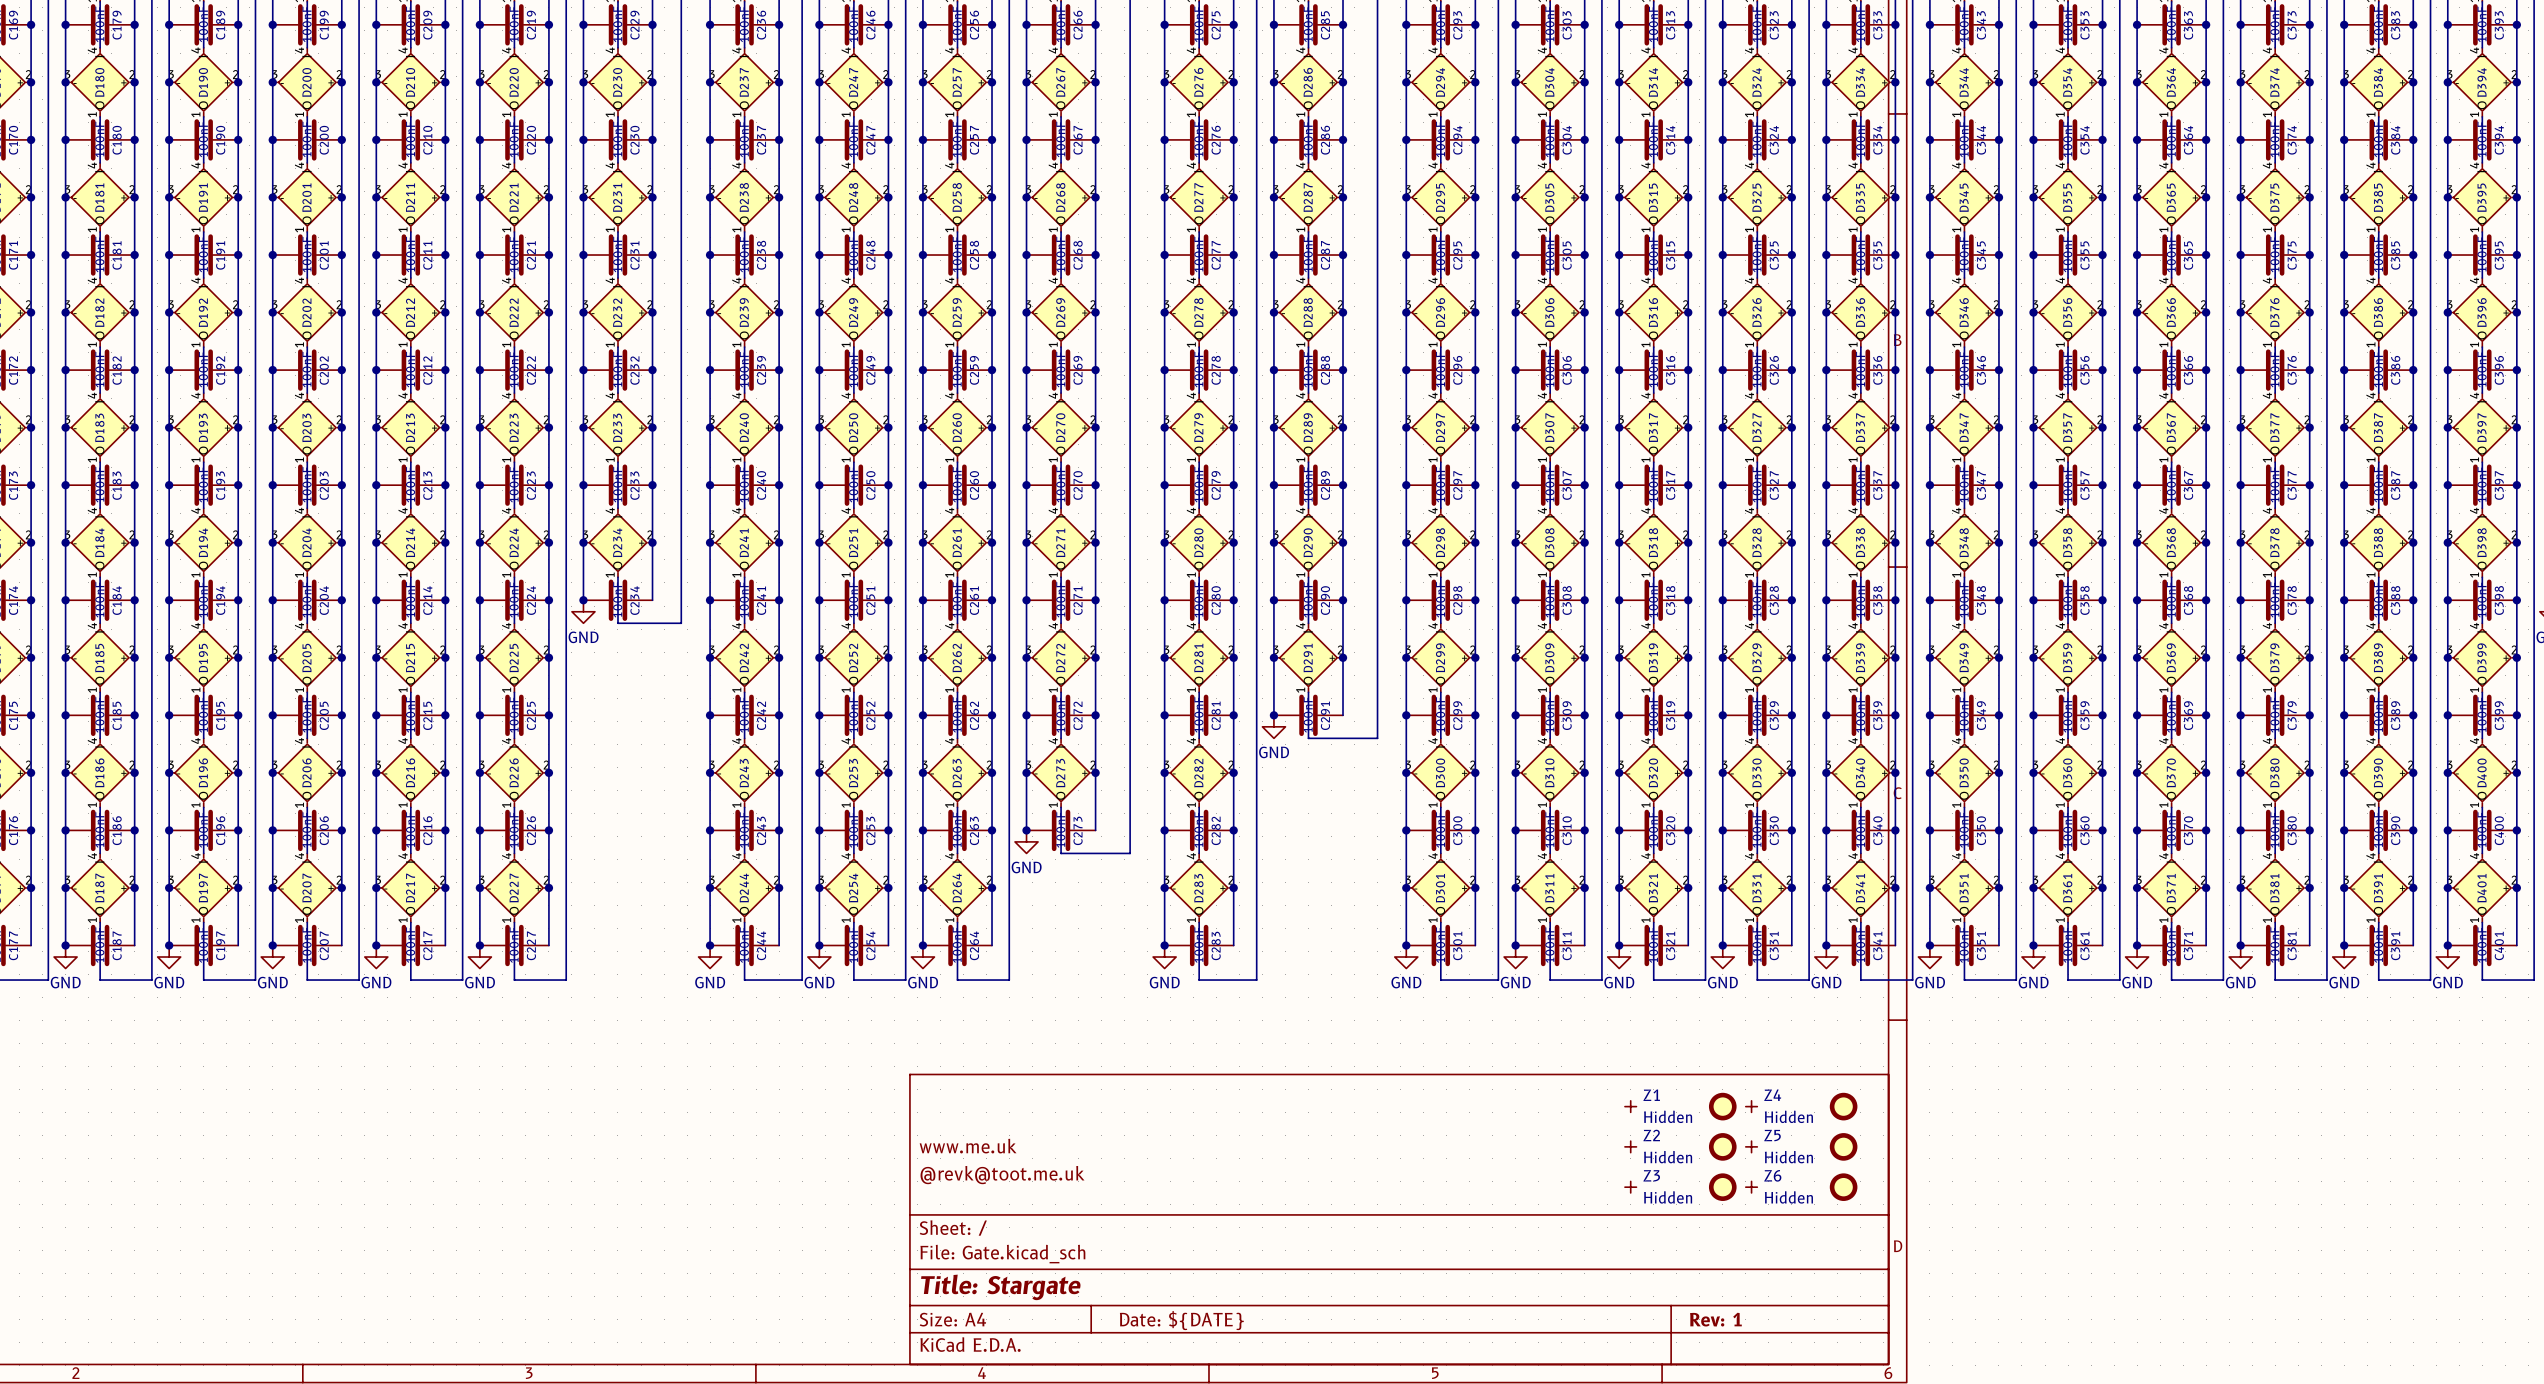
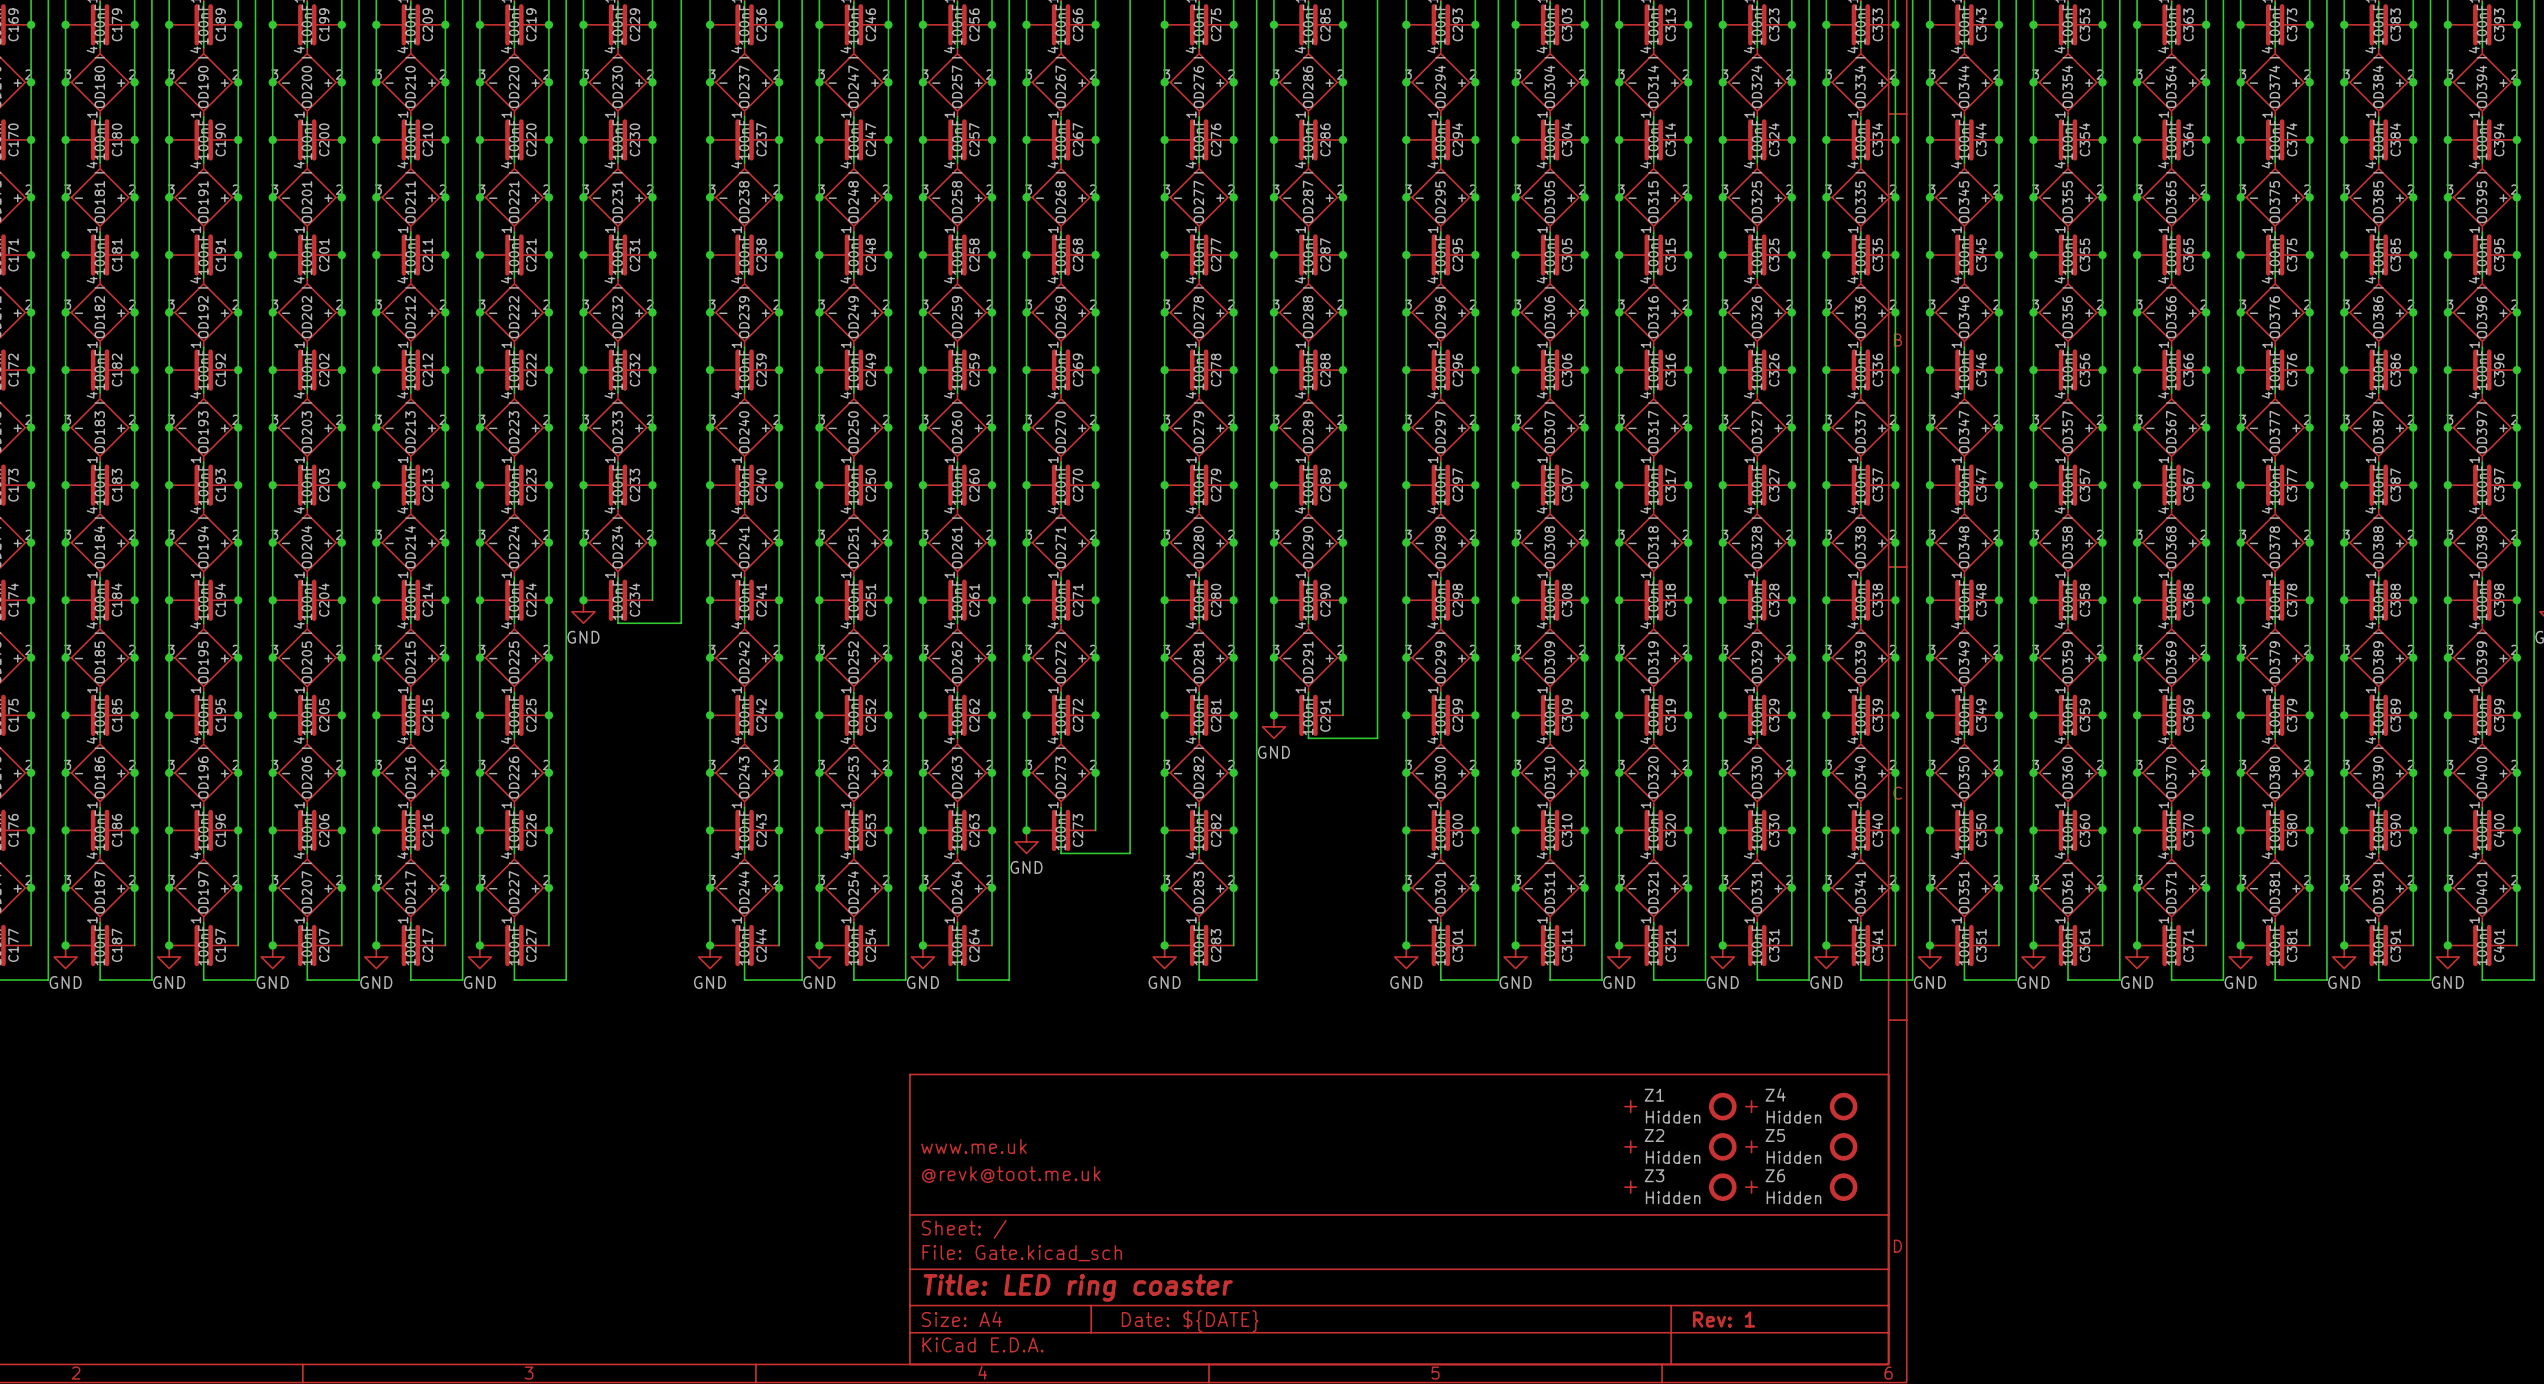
title block: Title: Stargate (1000, 1287) -> Title: LED ring coaster (1078, 1287)

